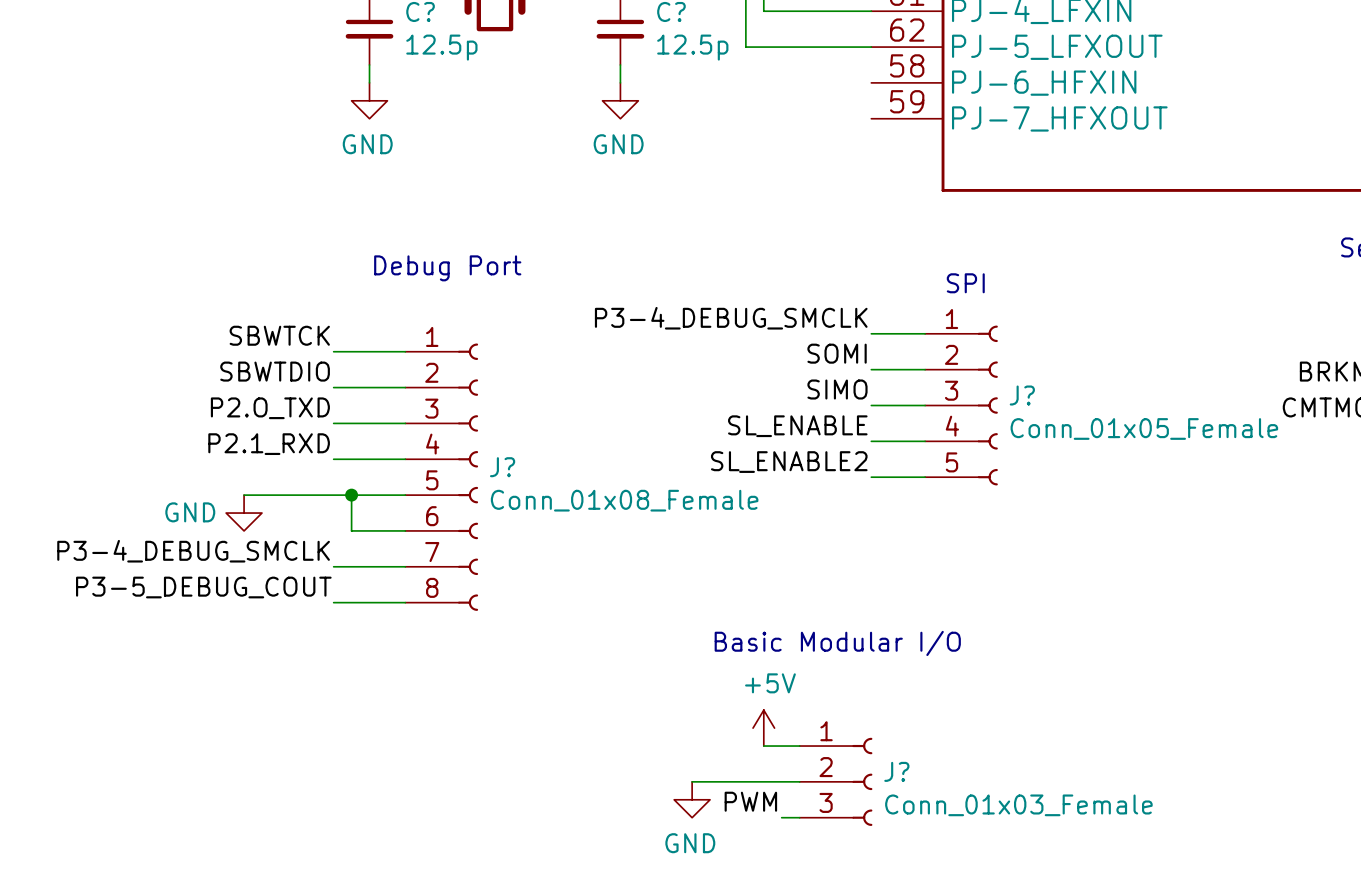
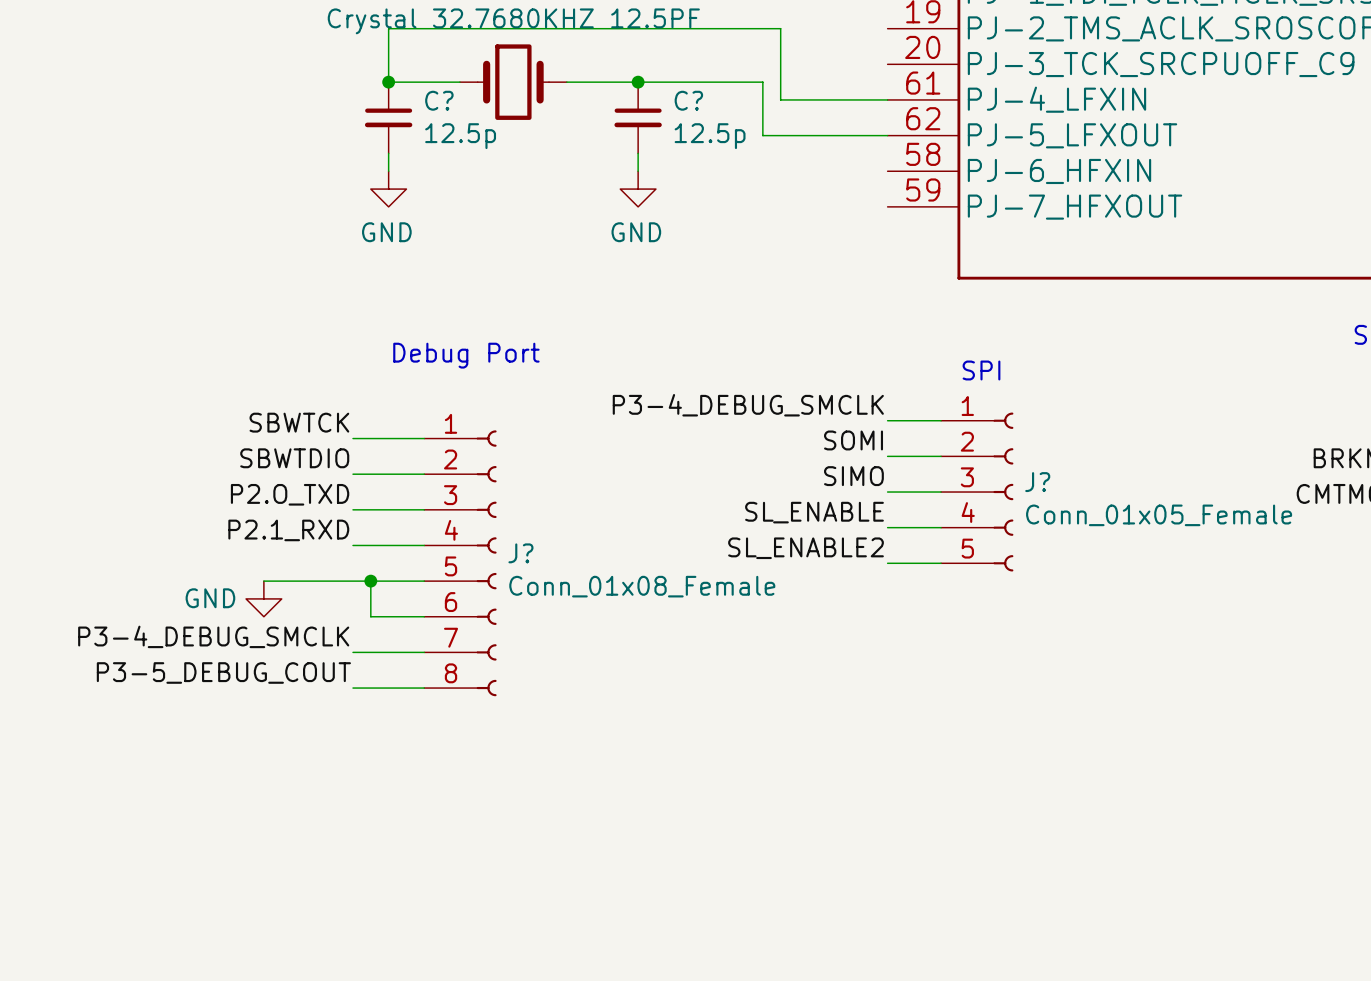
text: Basic Modular I/O (837, 643) -> none
power symbol: +5V (763, 728) -> none
wire: (763, 746) (799, 746) -> none
wire: (692, 781) (799, 781) -> none
J?: Conn_01x03_Female (836, 781) -> none
power symbol: GND (692, 799) -> none
label: PWM (750, 801) -> none
wire: (781, 817) (799, 817) -> none

